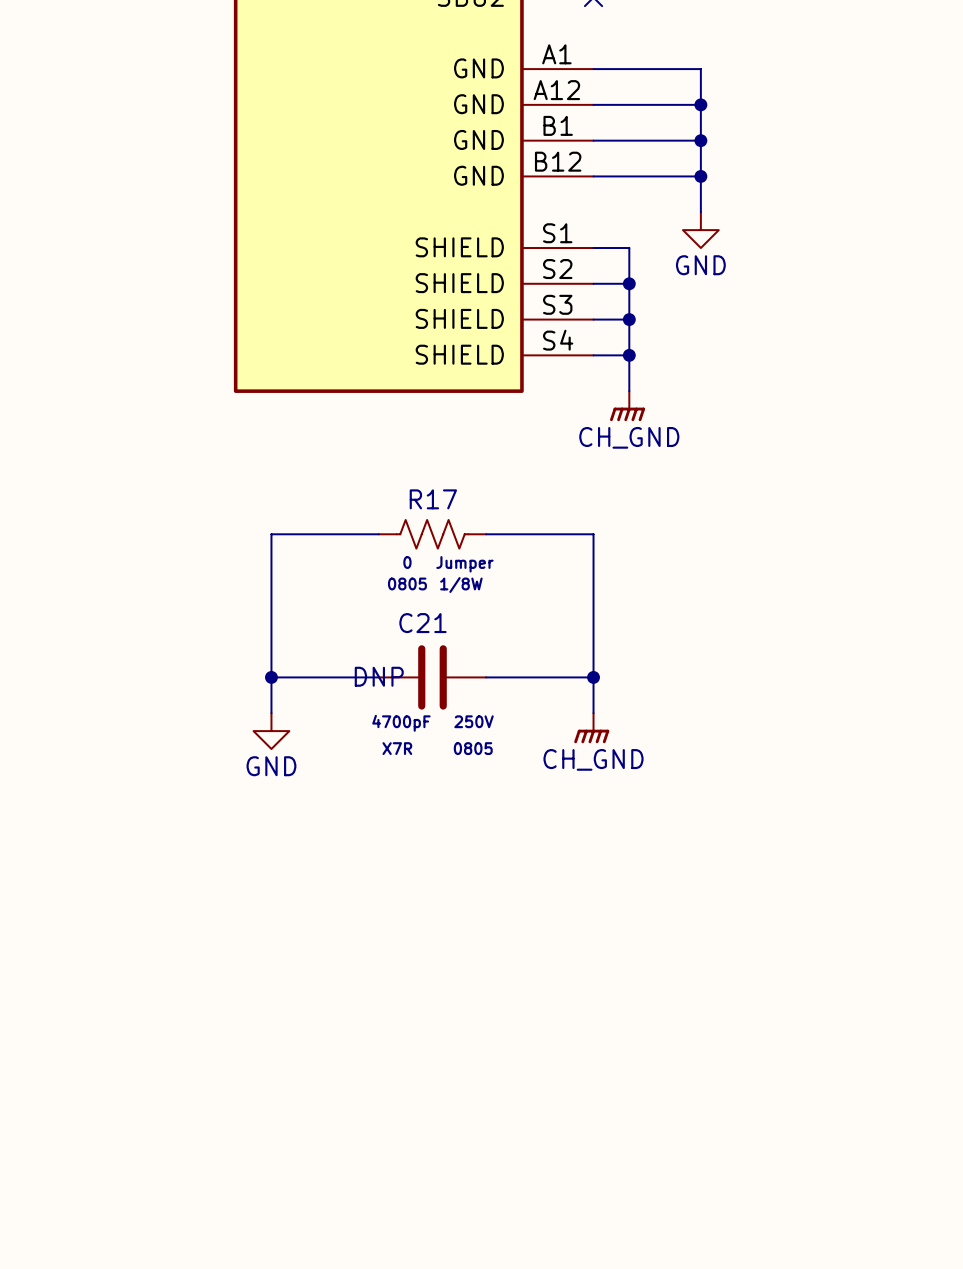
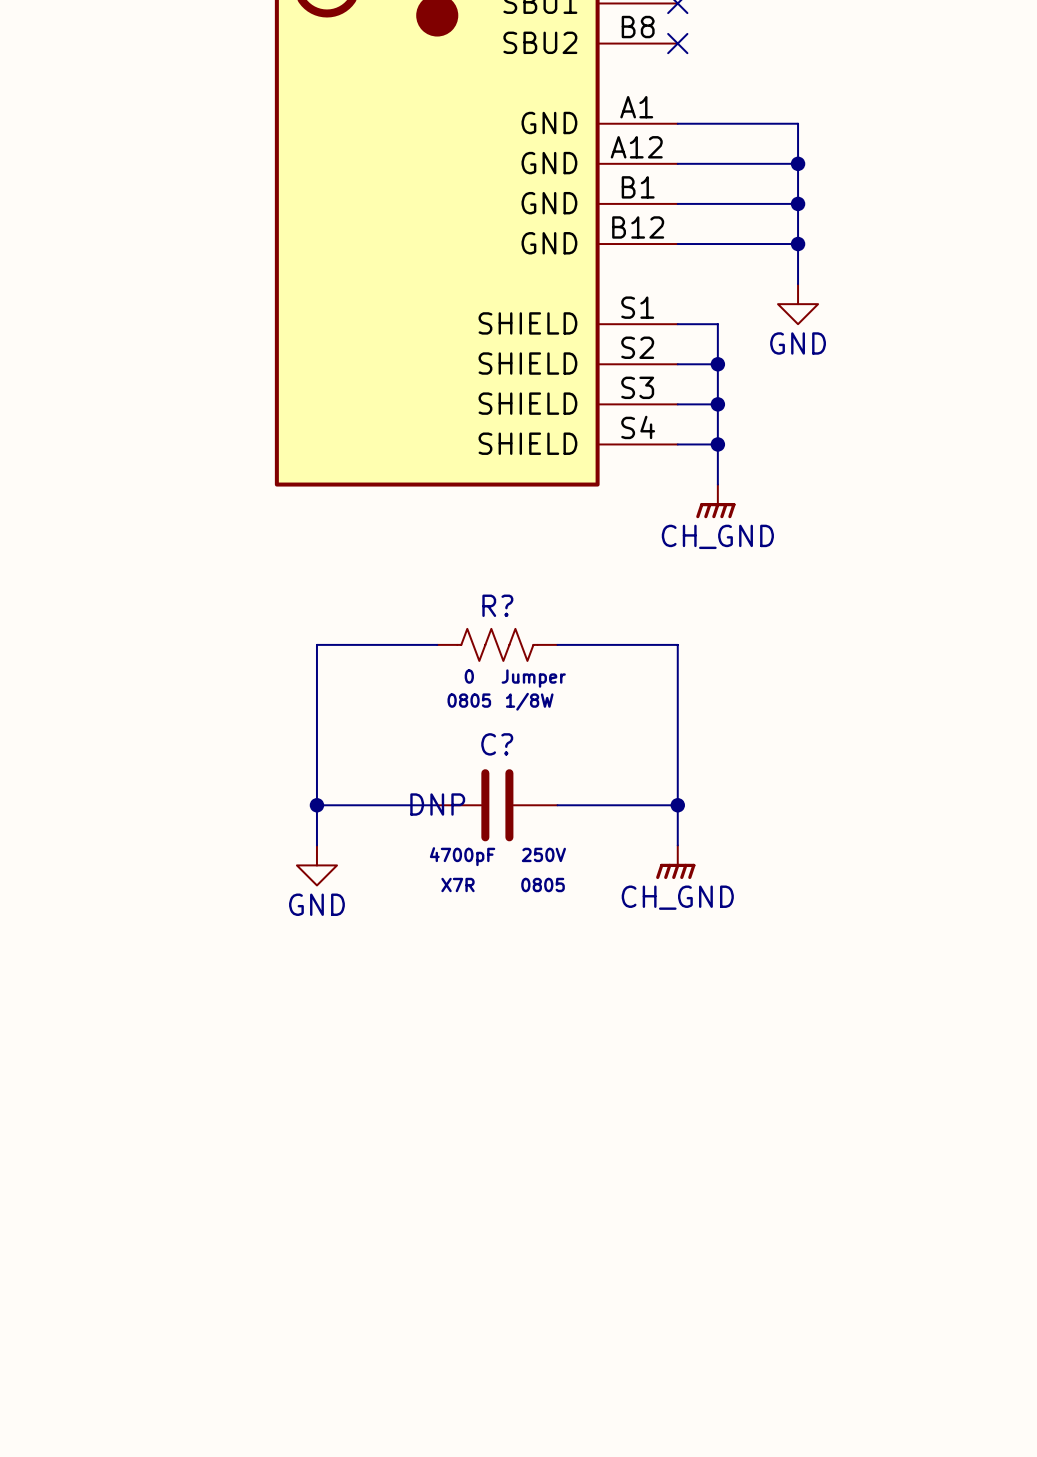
R17 name: R17 (433, 499) -> R? (497, 605)
C21 name: C21 (422, 623) -> C? (497, 744)

